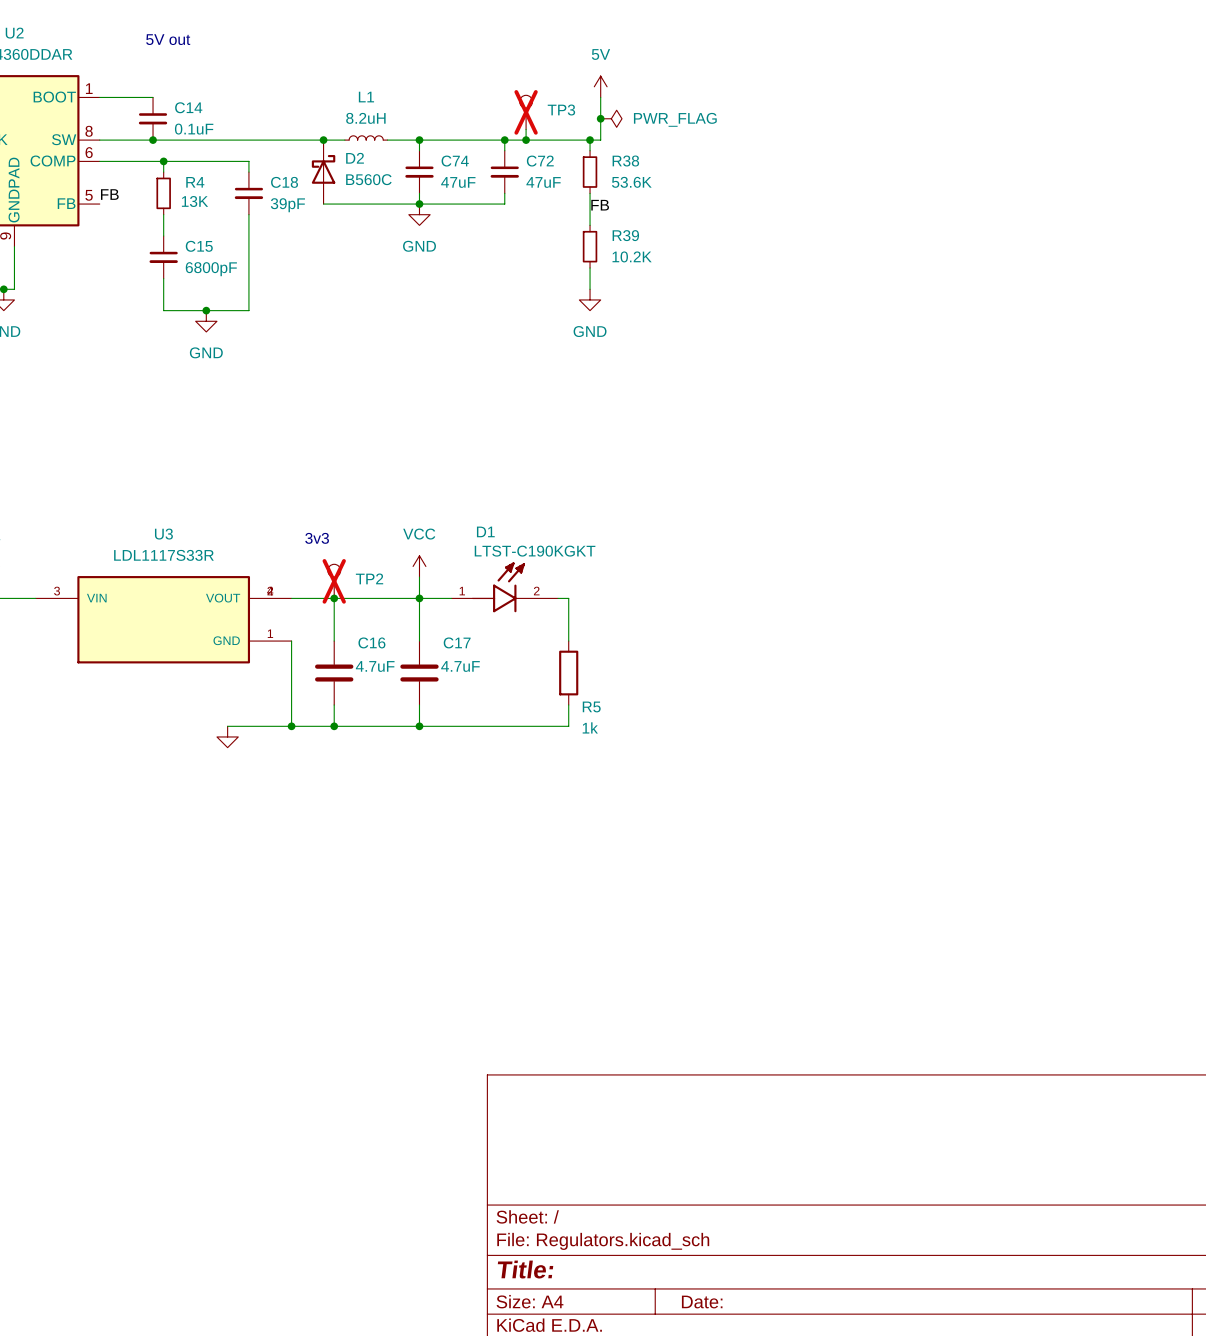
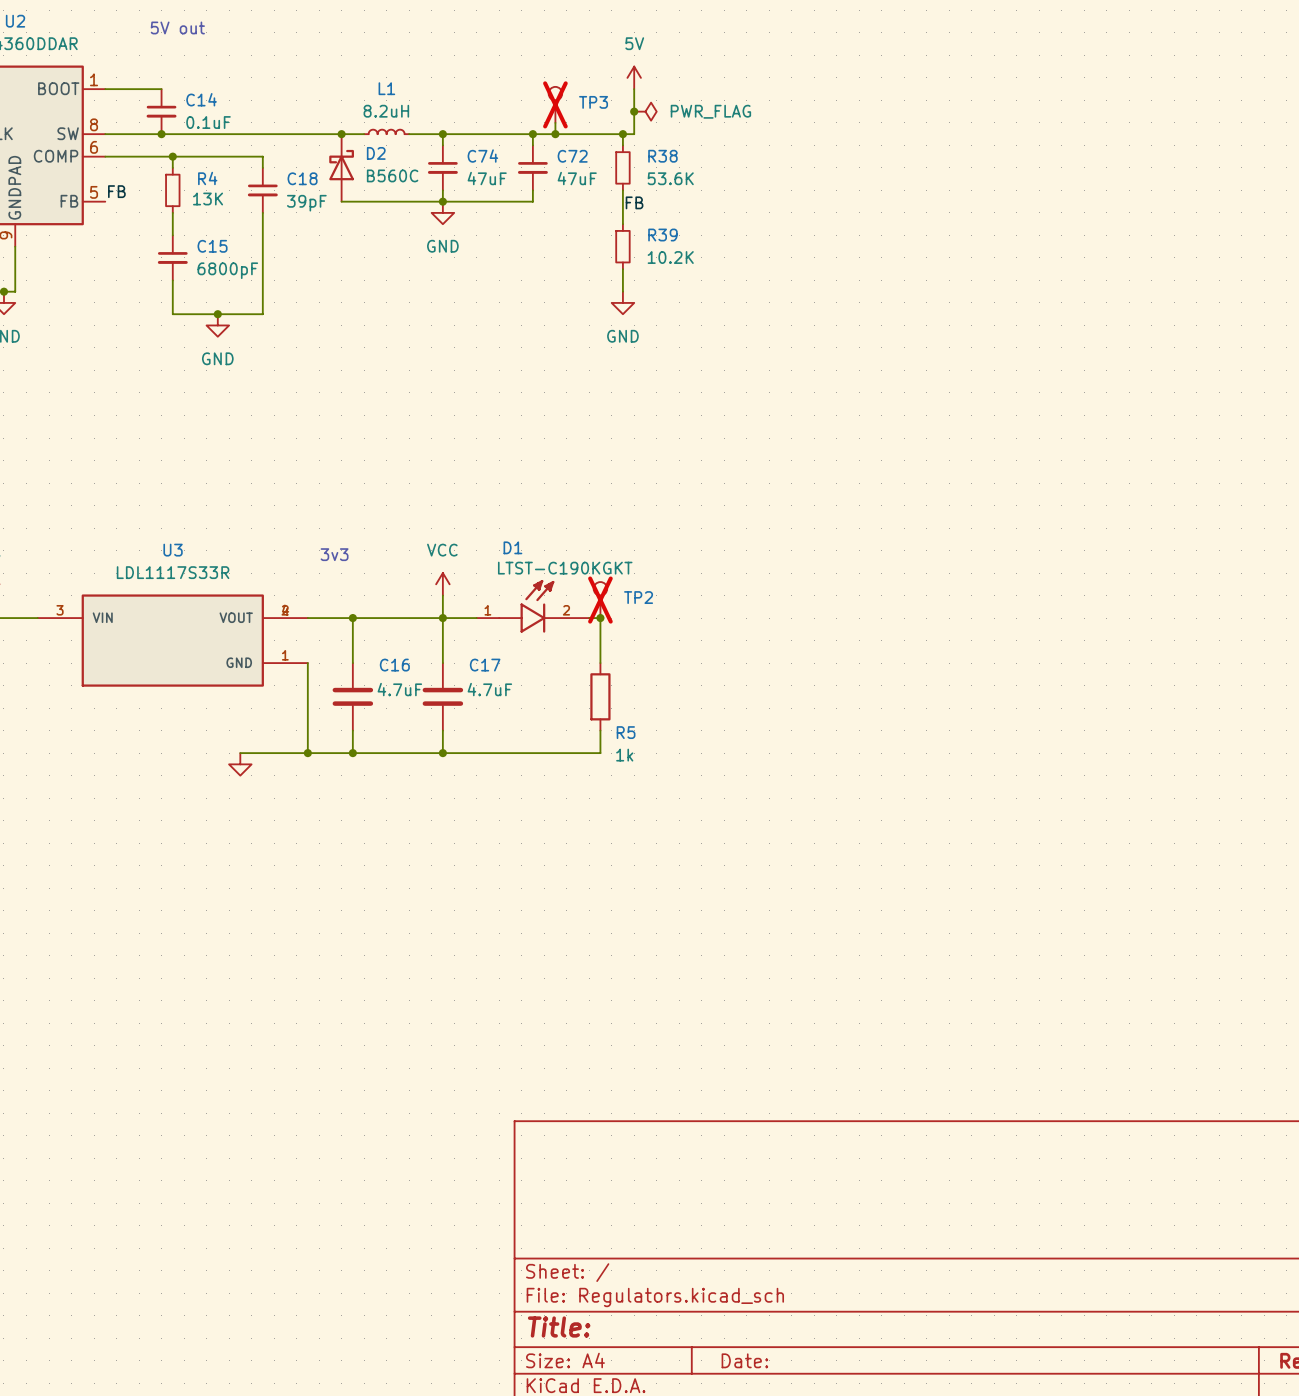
TP2 position: (334, 581) -> (600, 600)
junction: none -> (600, 618)

